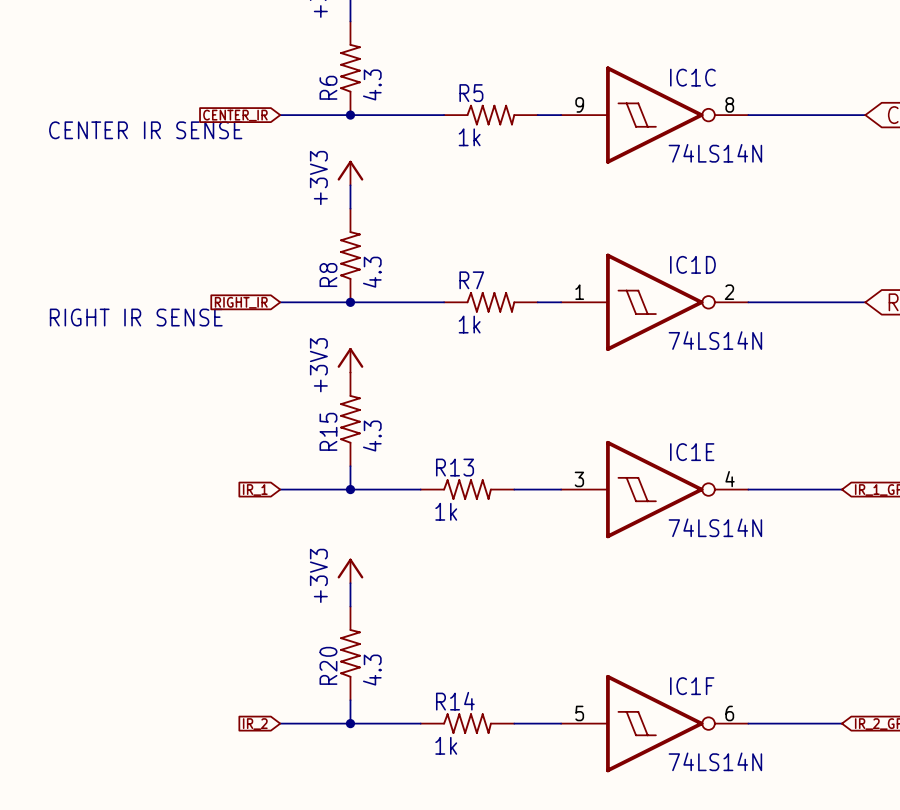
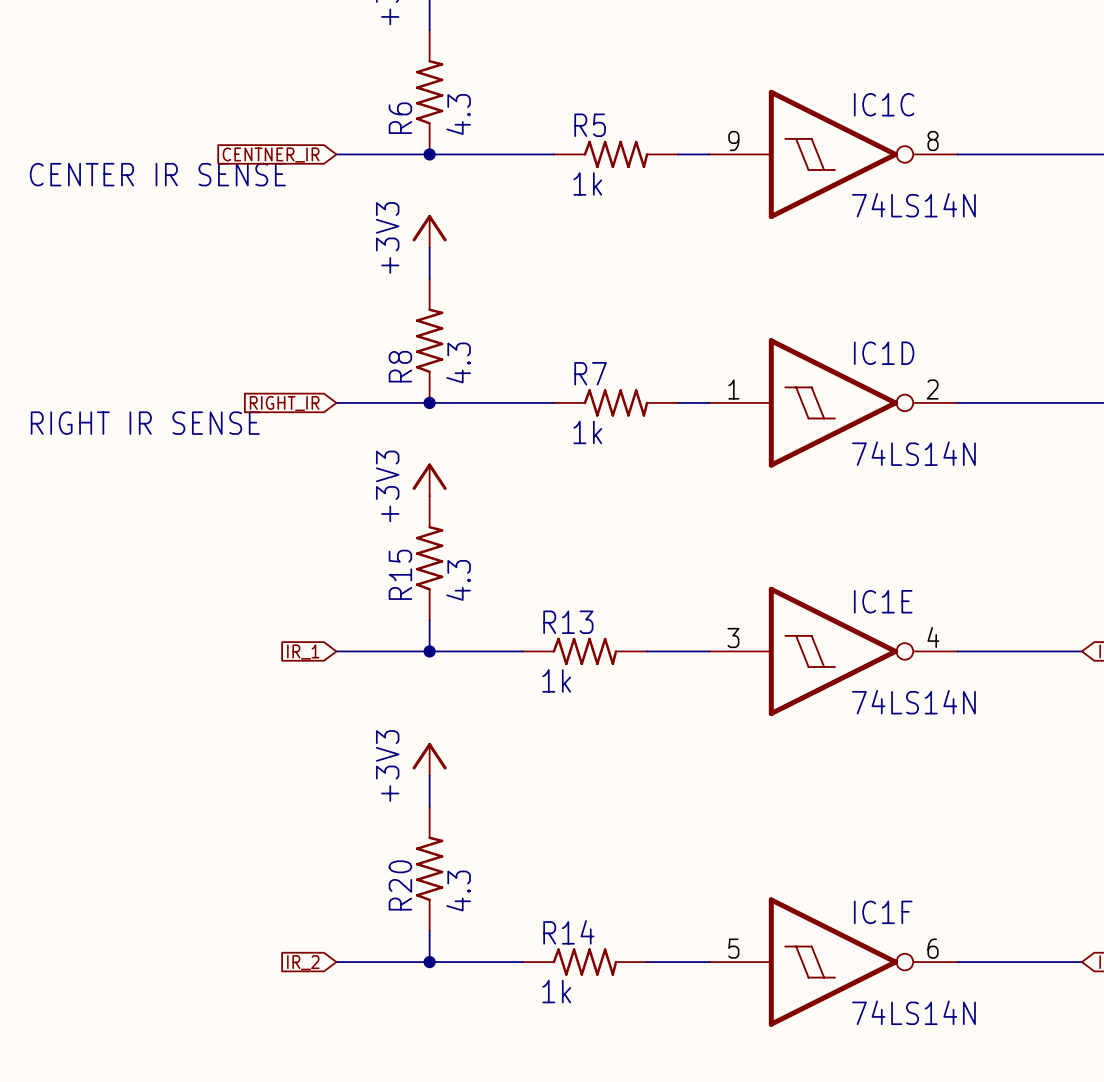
global label: CENTER_IR (235, 115) -> CENTNER_IR (271, 155)

